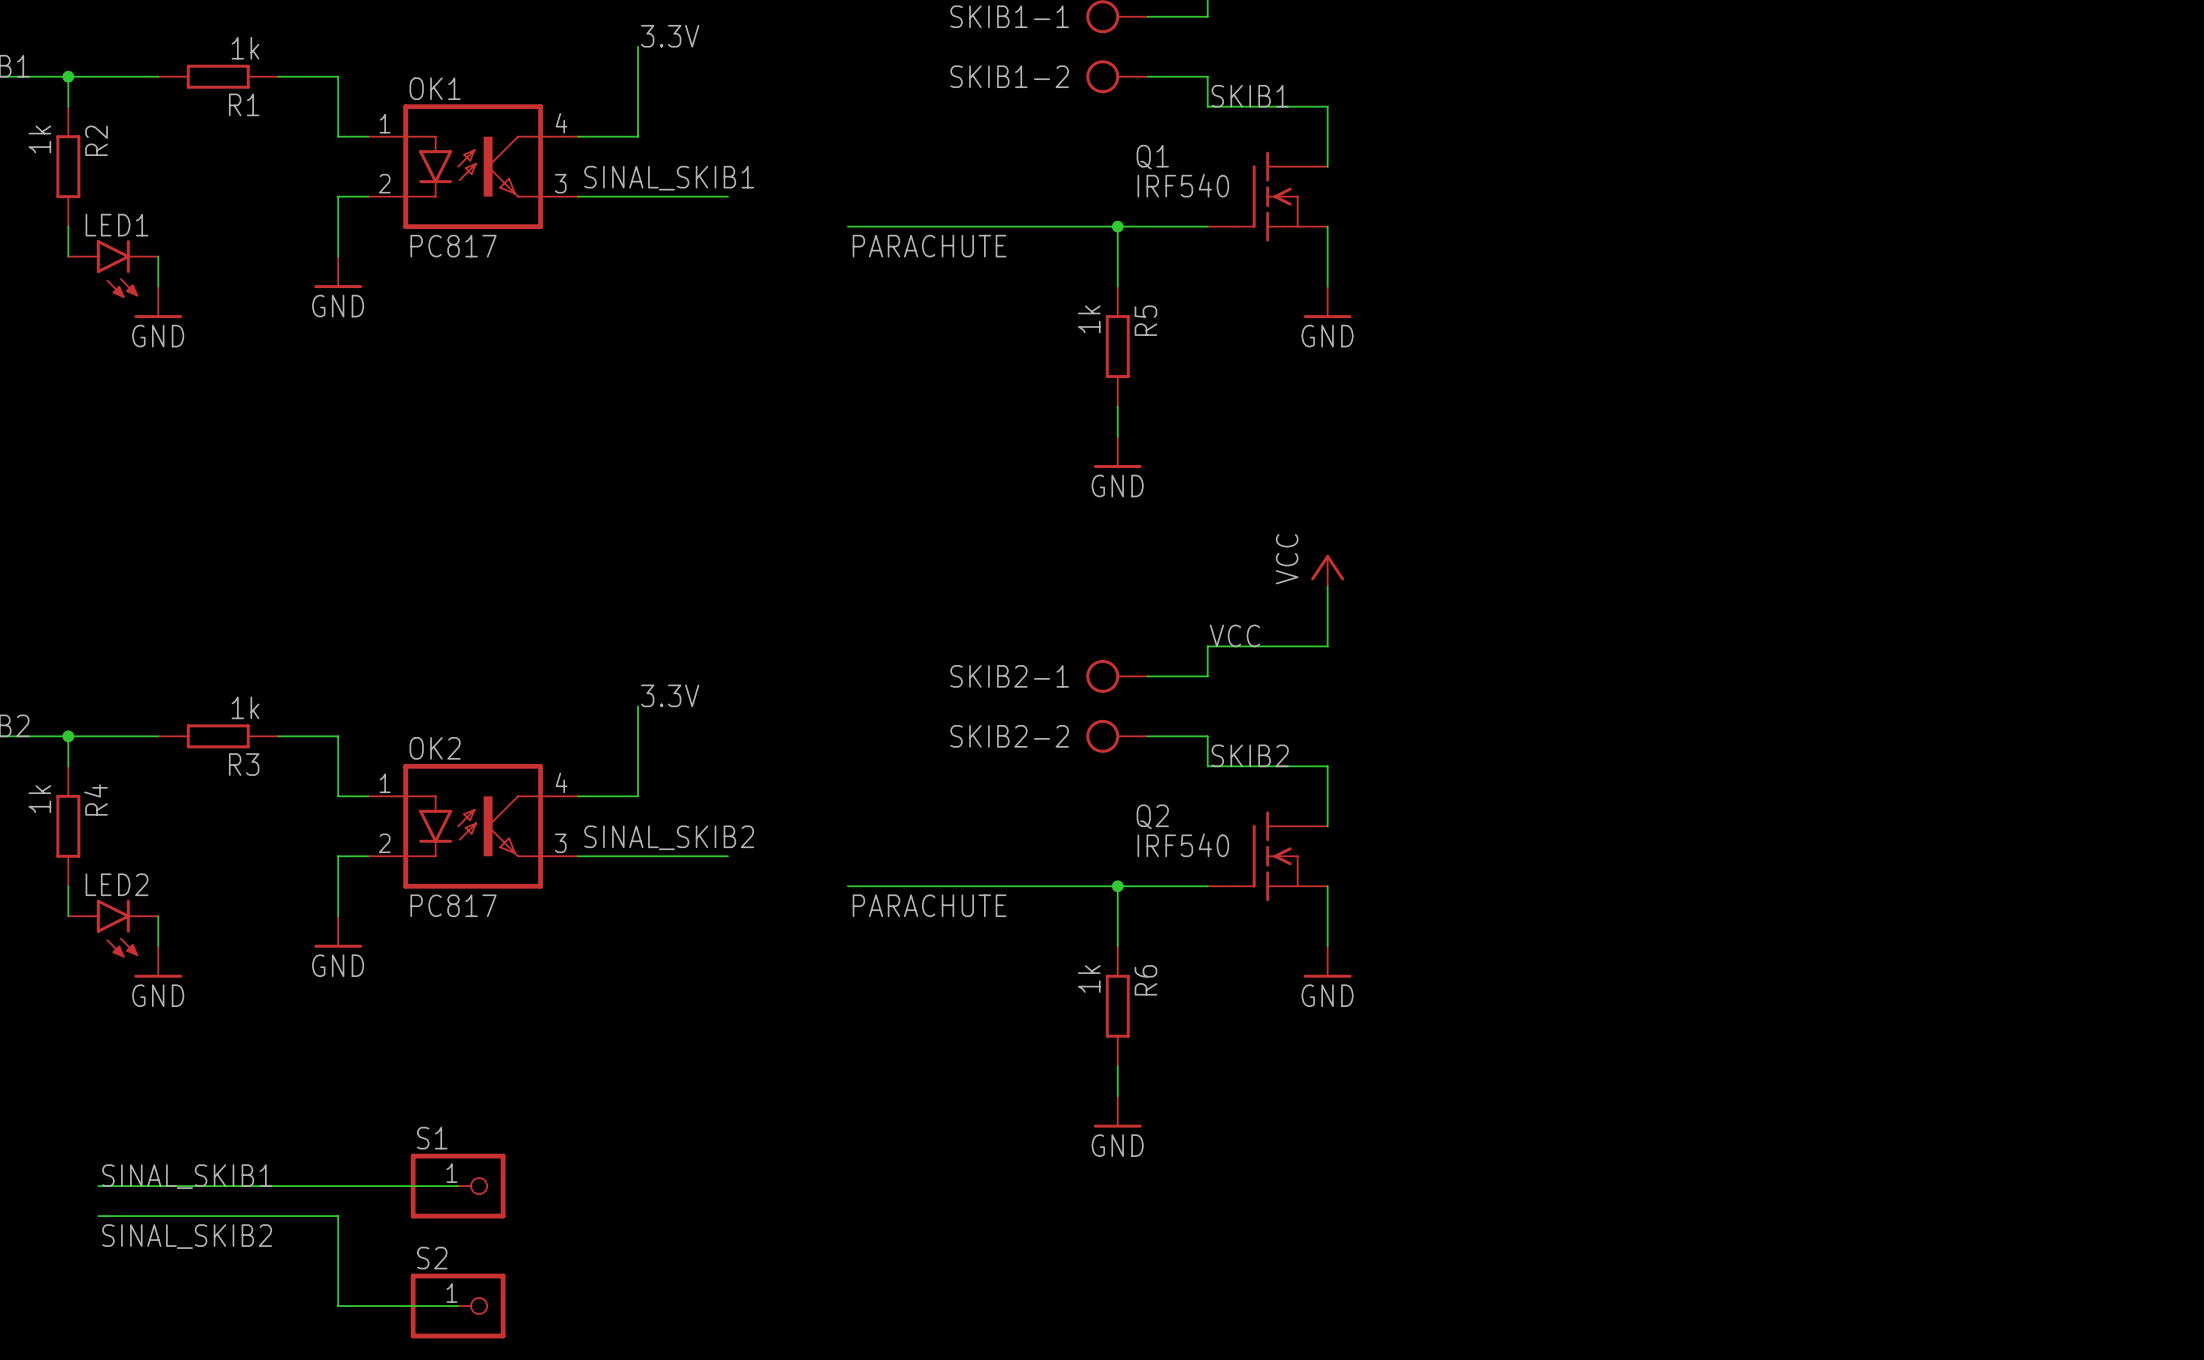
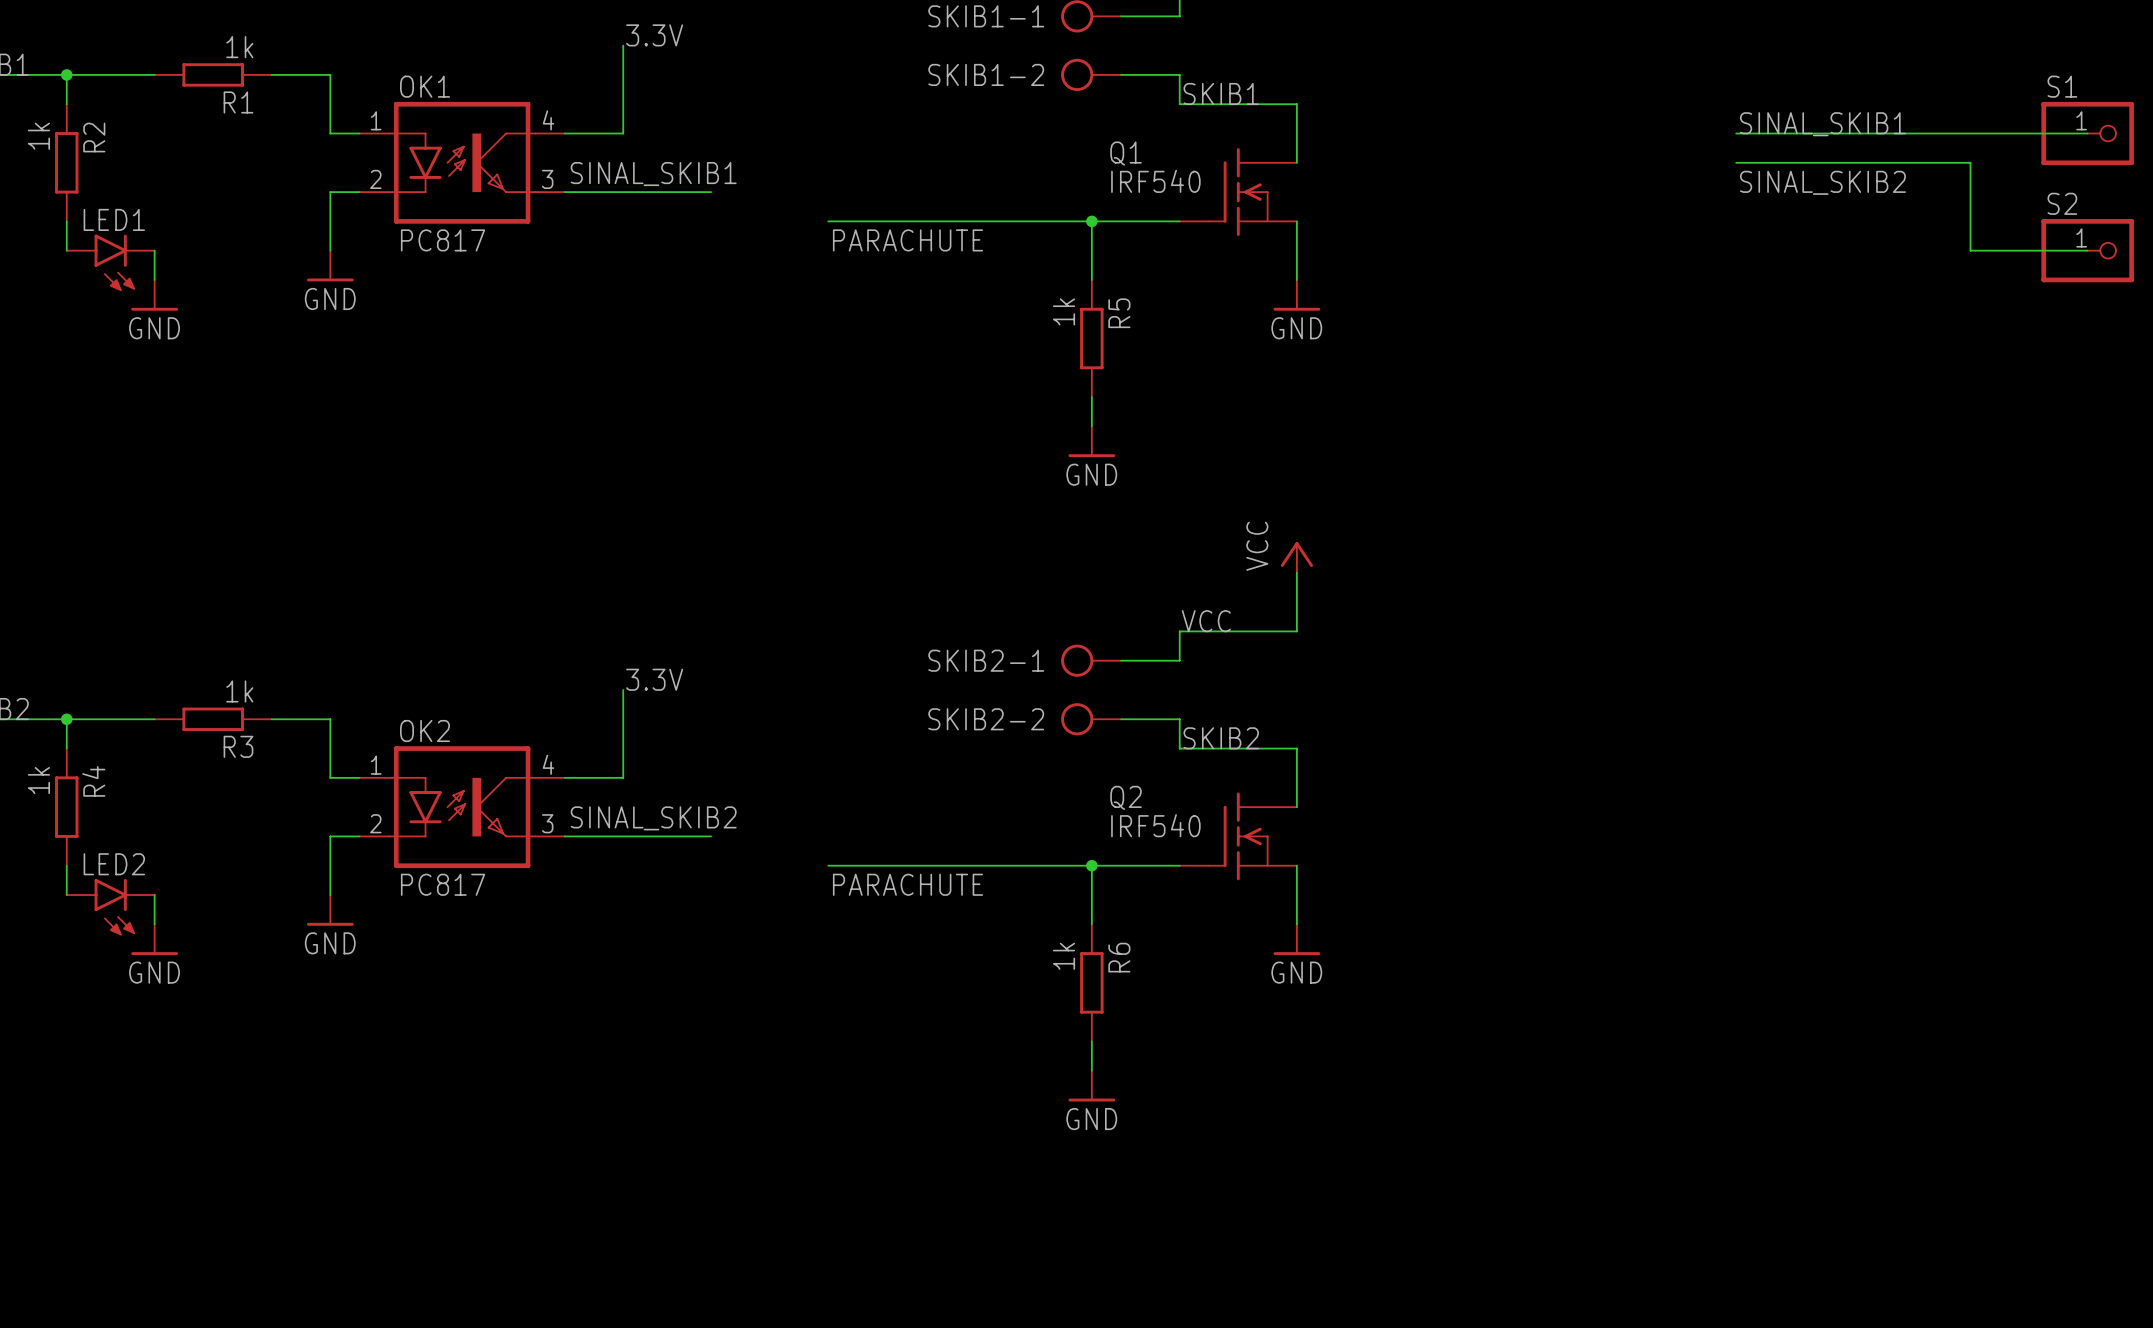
label: none -> SINAL_SKIB1 (1822, 124)
wire: none -> (1736, 133) (2087, 133)
wire: none -> (1736, 162) (1970, 162) (1970, 250) (2087, 250)
label: none -> SINAL_SKIB2 (1822, 182)
label: SINAL_SKIB1 (187, 1176) -> none
wire: (98, 1186) (458, 1186) -> none
S1 position: (458, 1186) -> (2087, 133)
wire: (98, 1216) (338, 1216) (338, 1306) (458, 1306) -> none
label: SINAL_SKIB2 (187, 1236) -> none
S2 position: (458, 1306) -> (2087, 250)

